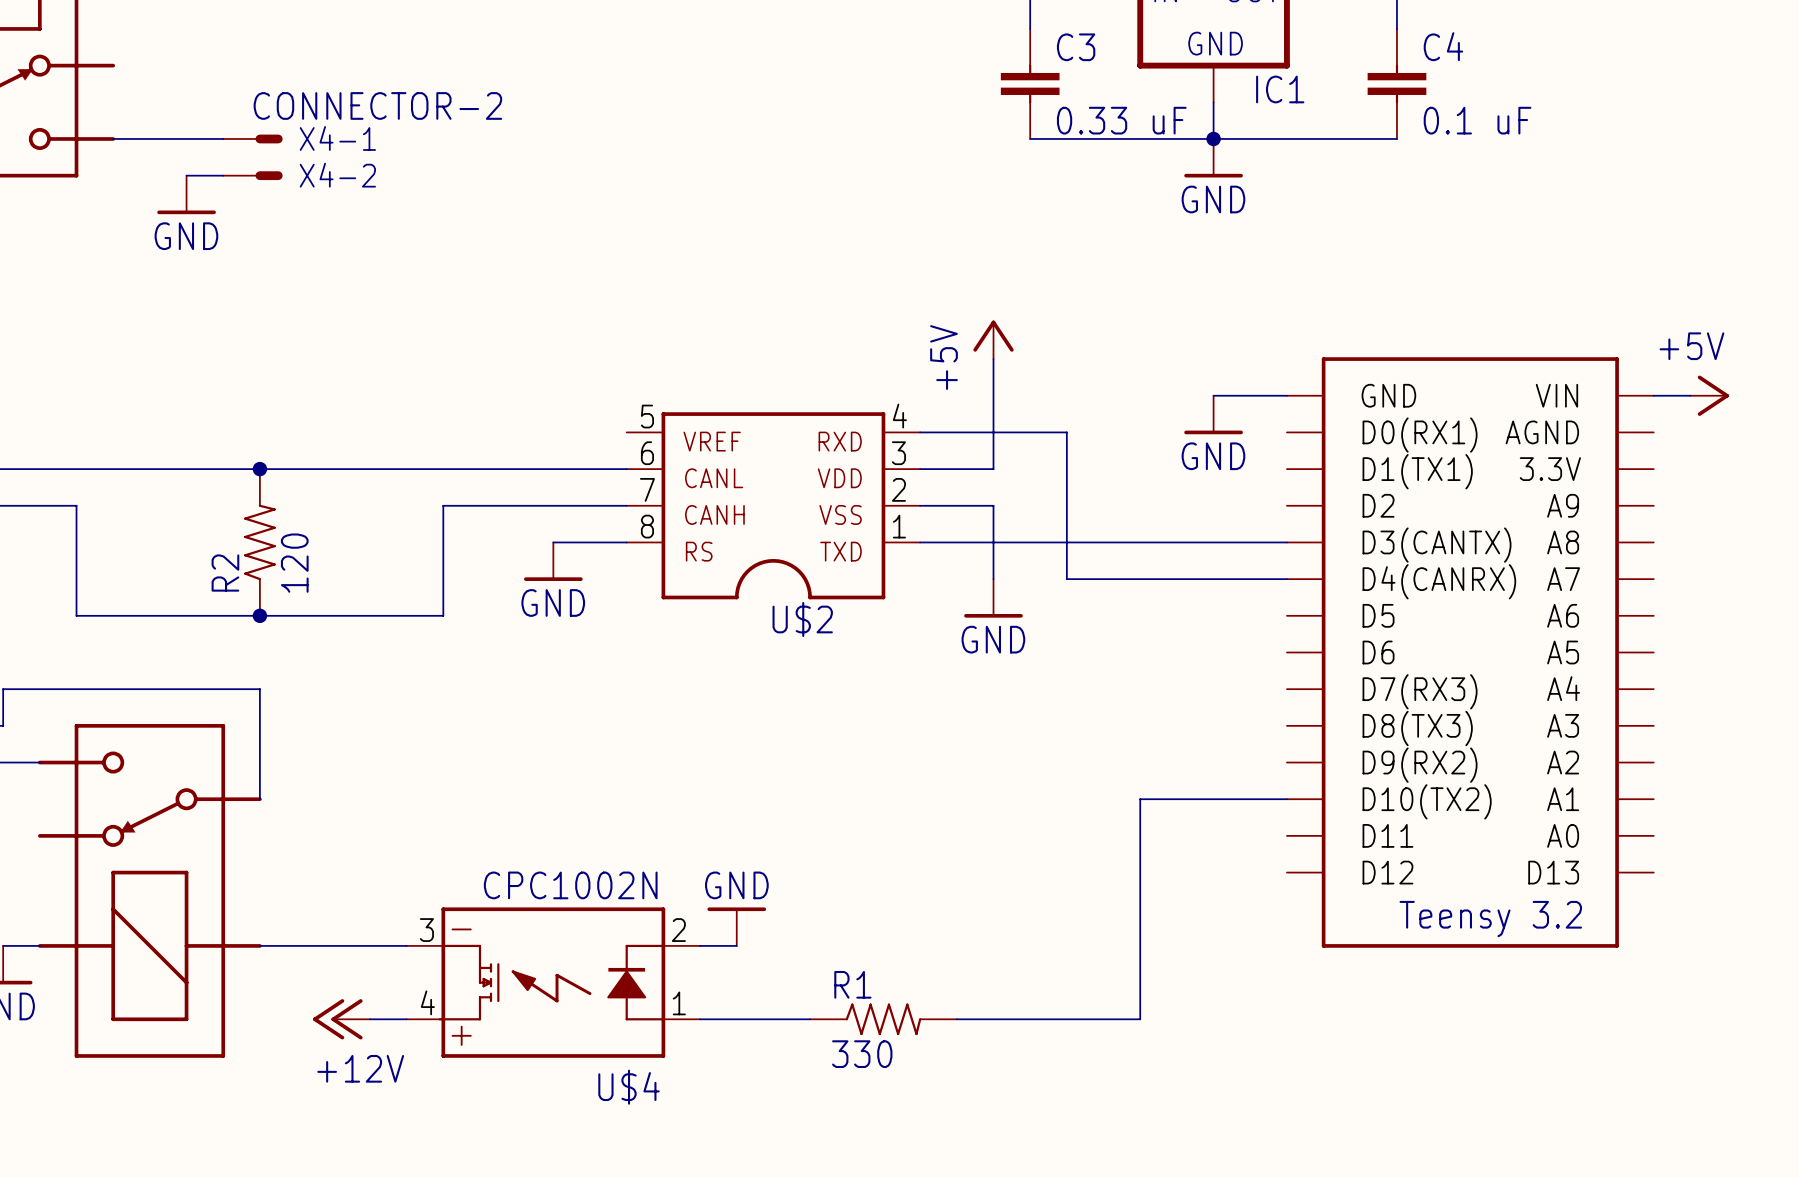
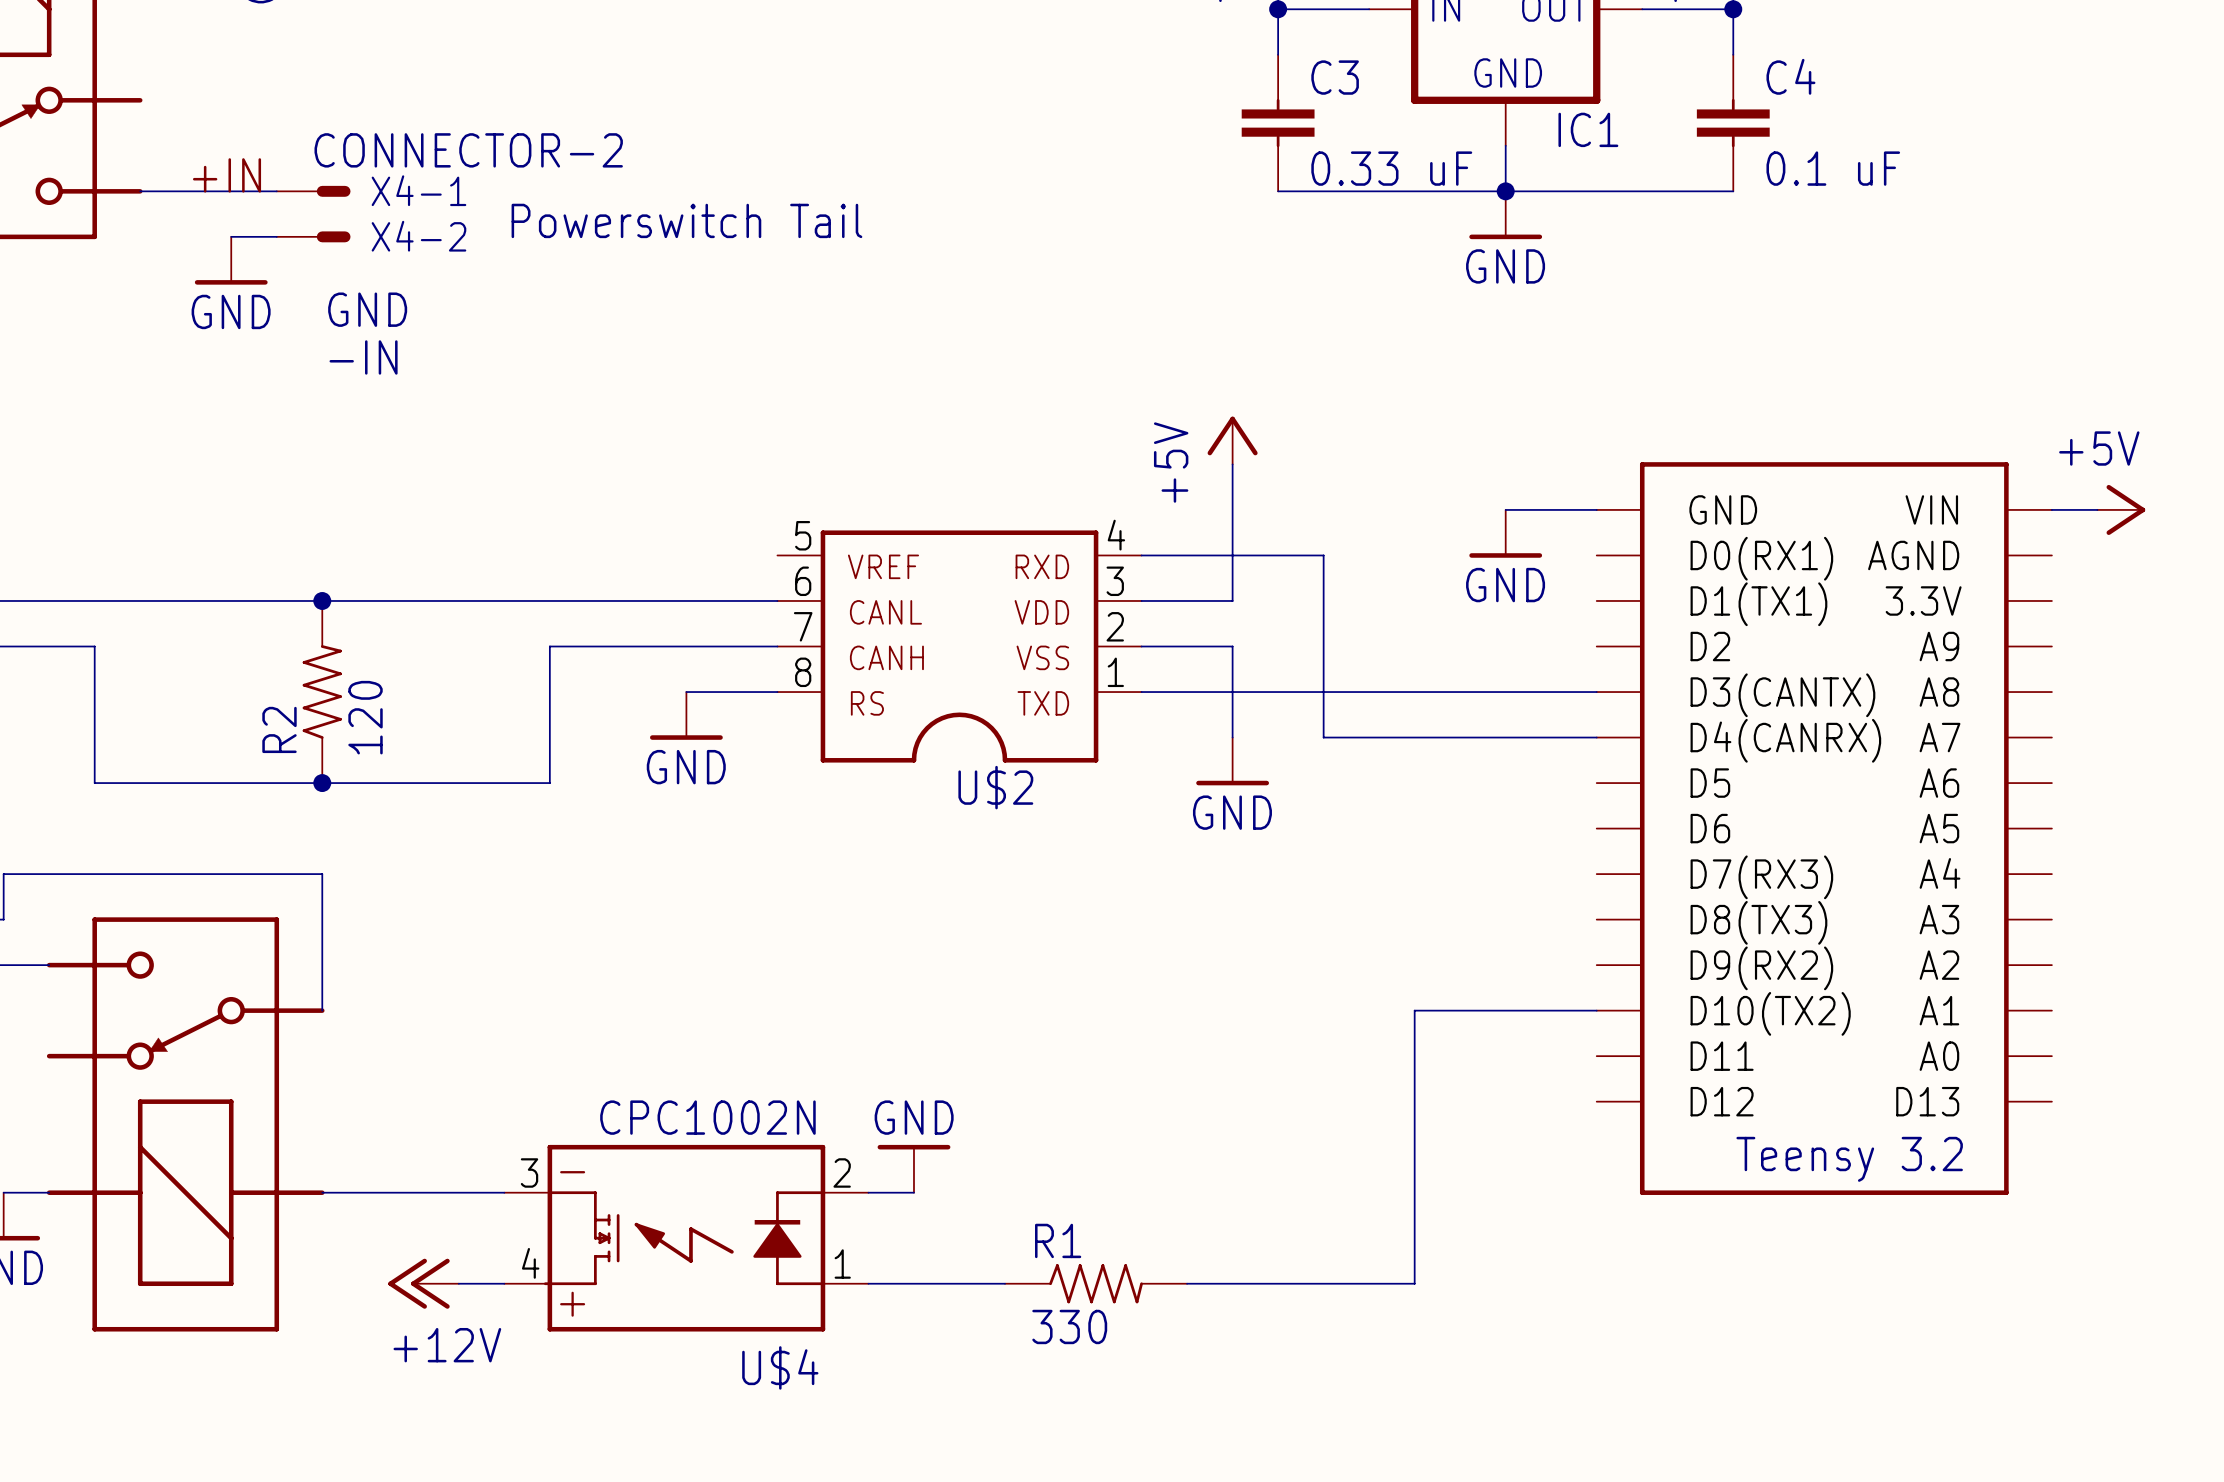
label: none -> +IN (227, 175)
text: none -> Powerswitch Tail (686, 220)
text: none -> GND (367, 309)
text: none -> -IN (363, 357)

